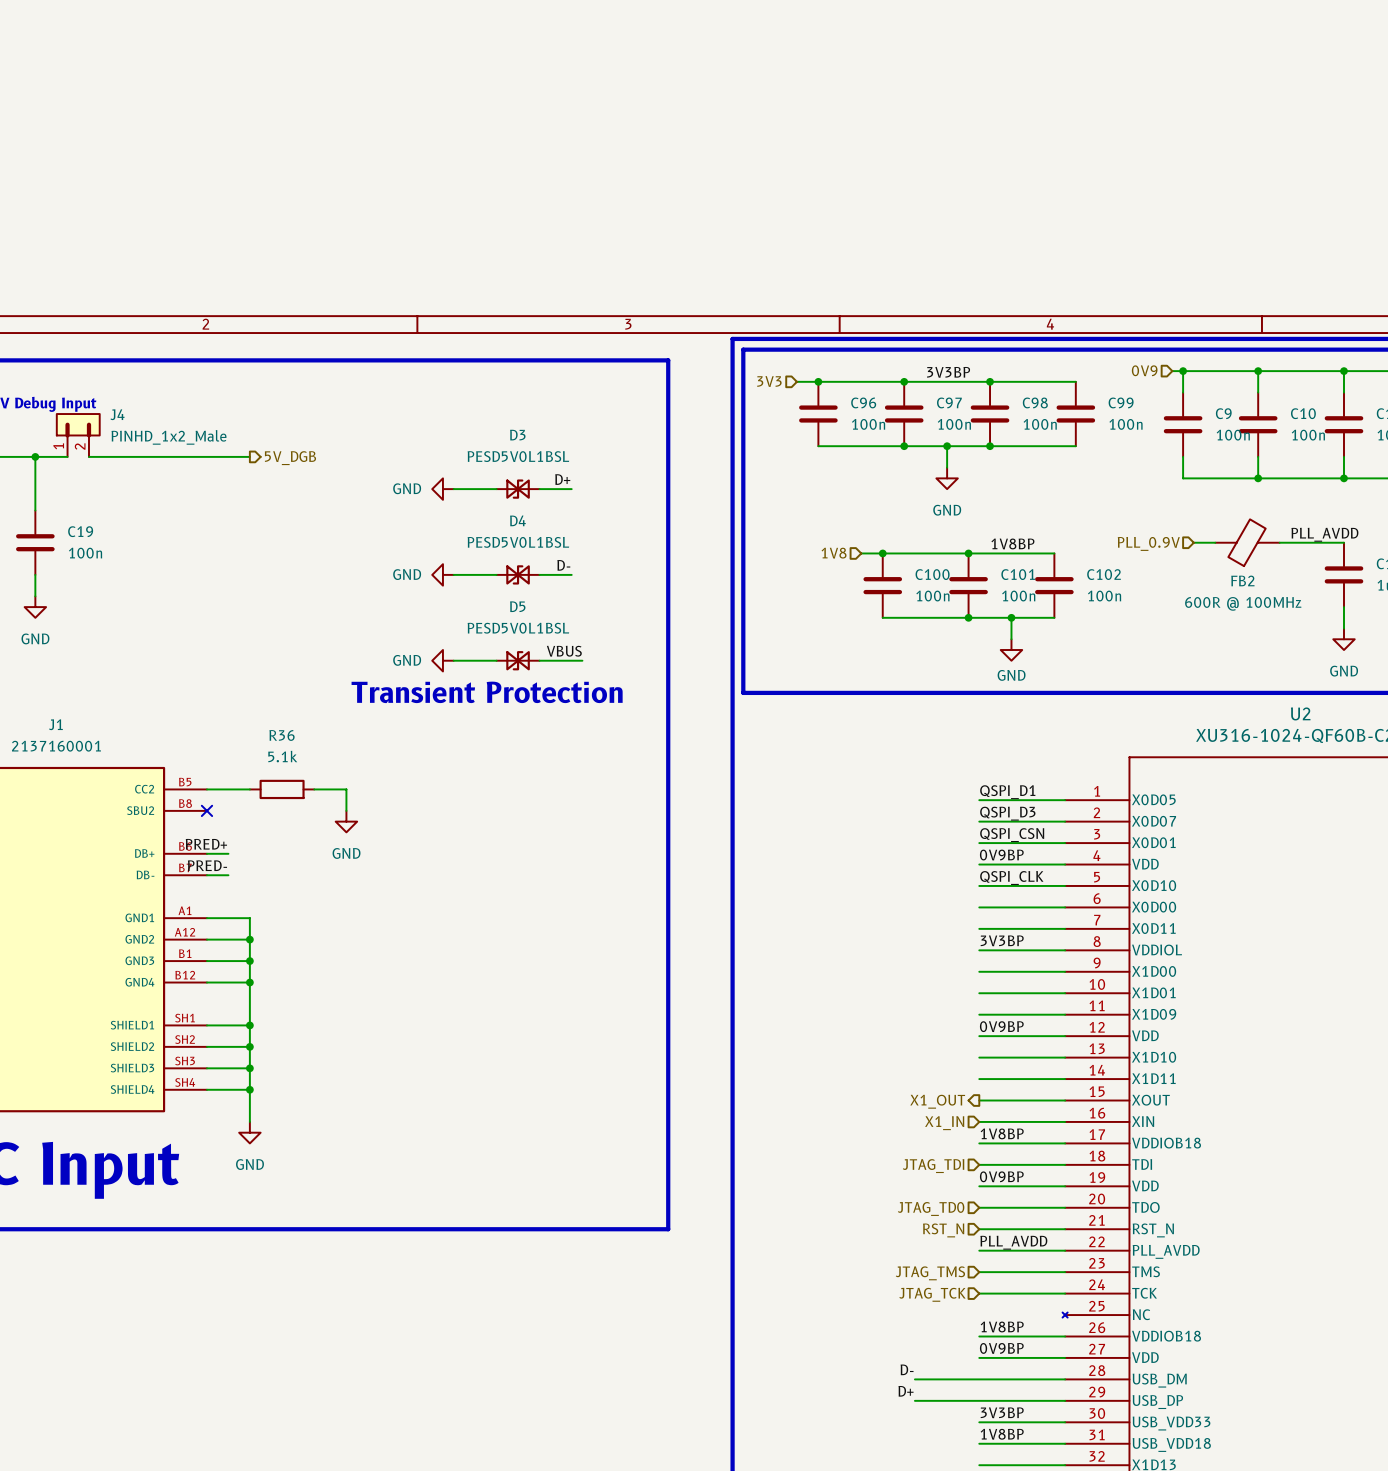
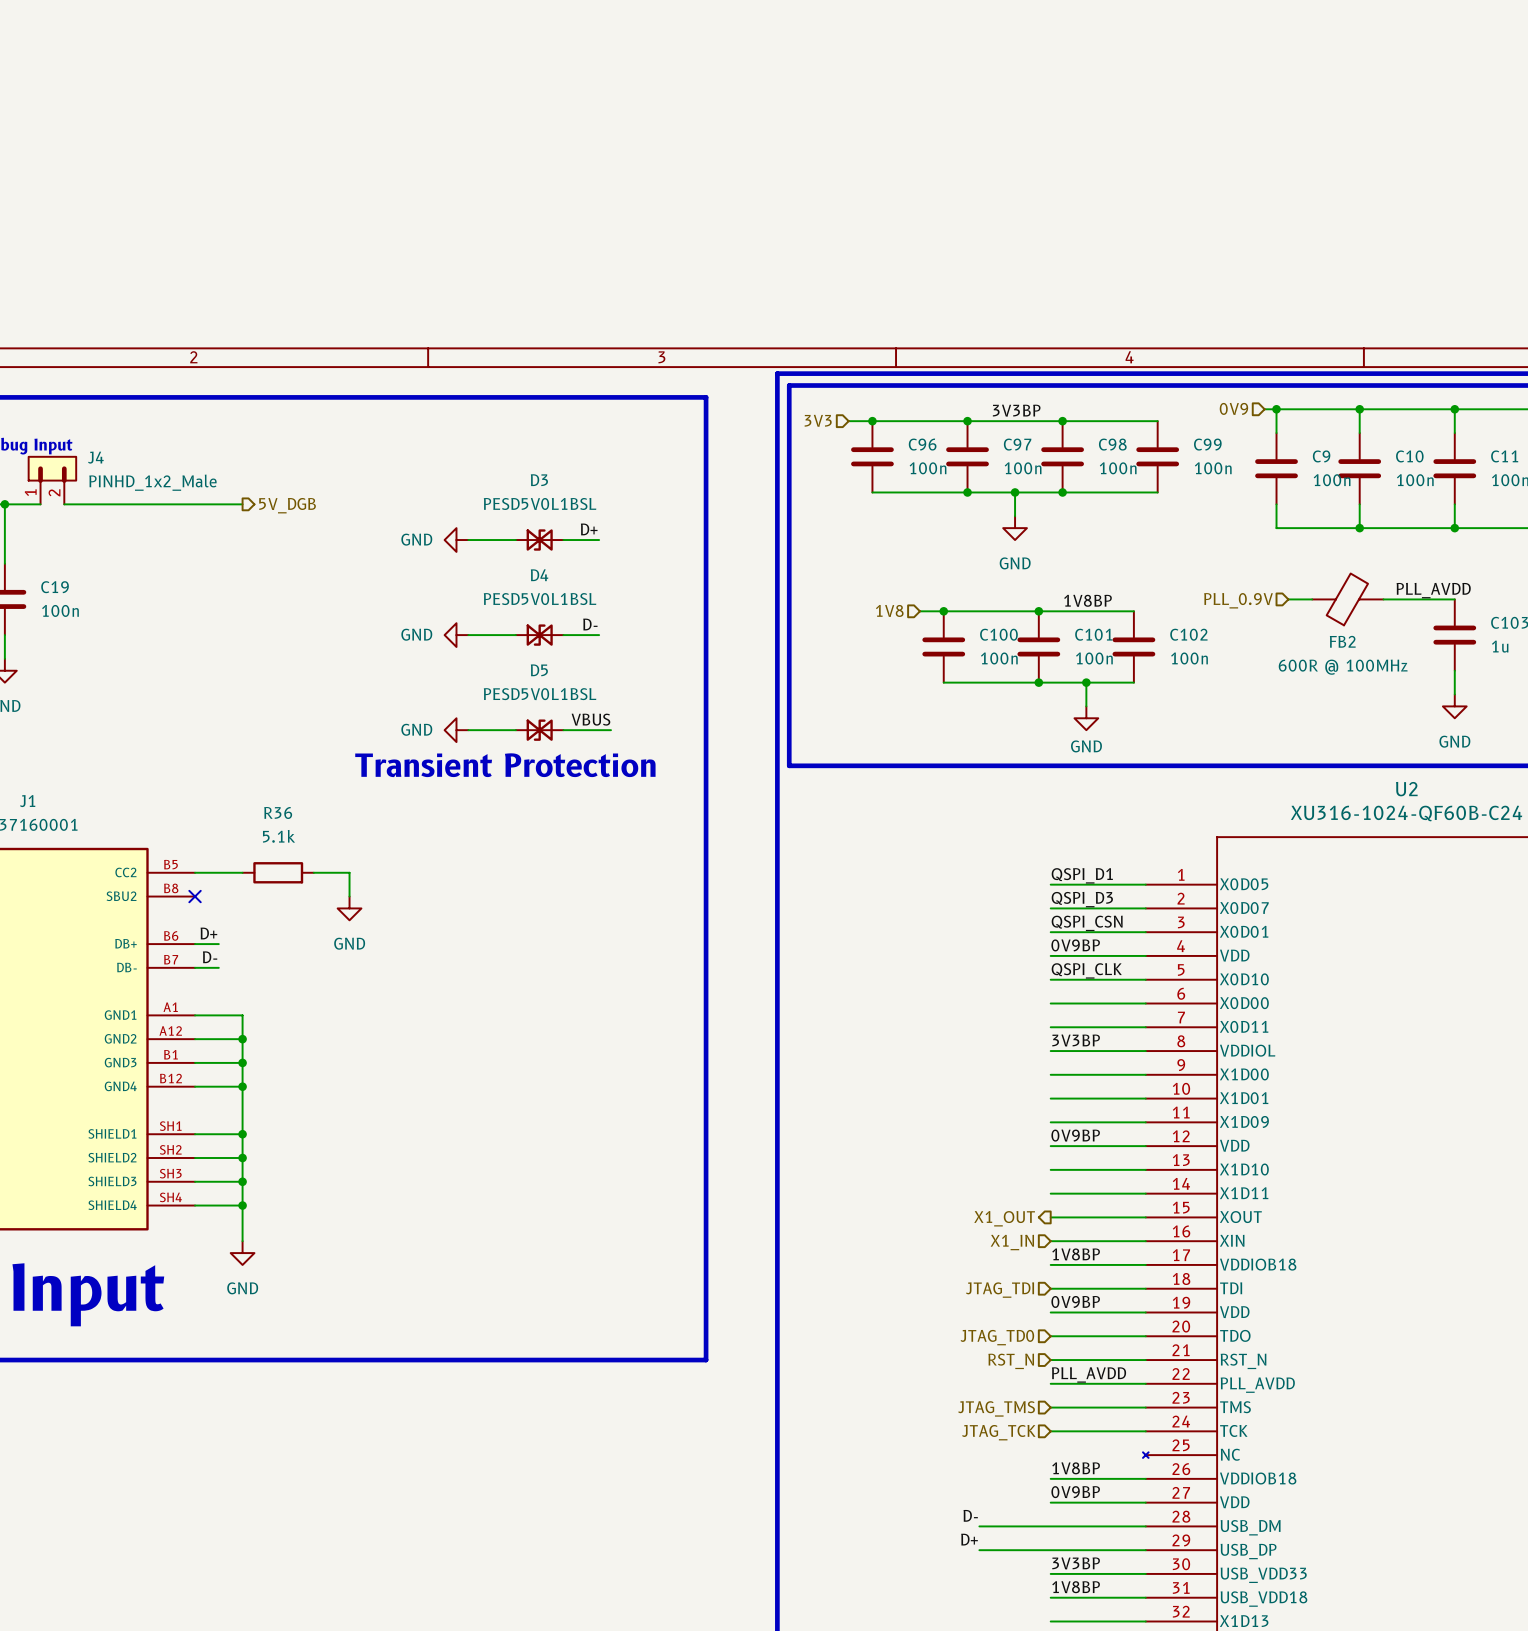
label: PRED+ (206, 844) -> D+ (208, 933)
label: PRED- (207, 865) -> D- (210, 957)

